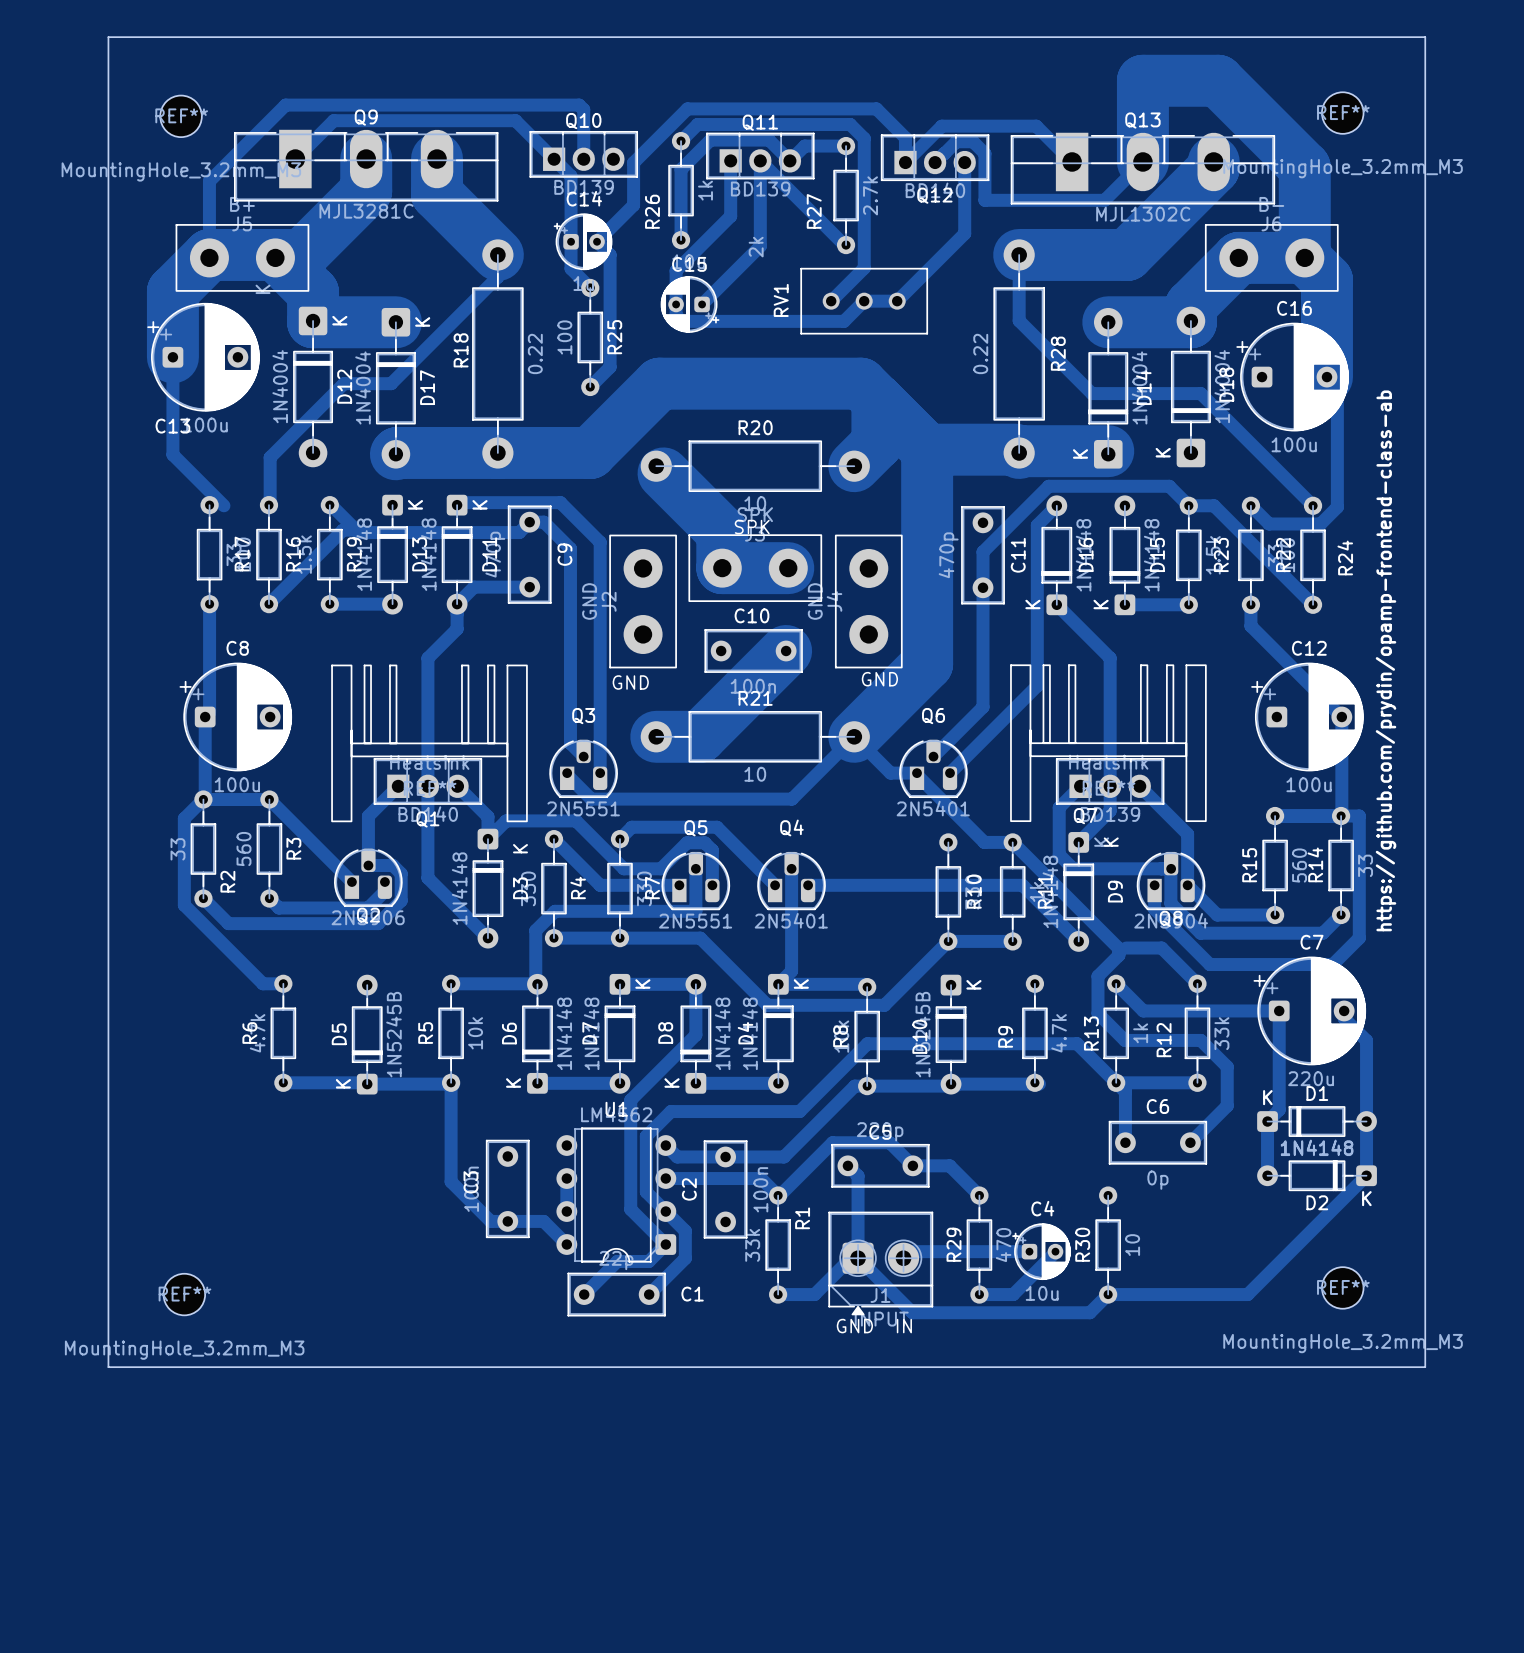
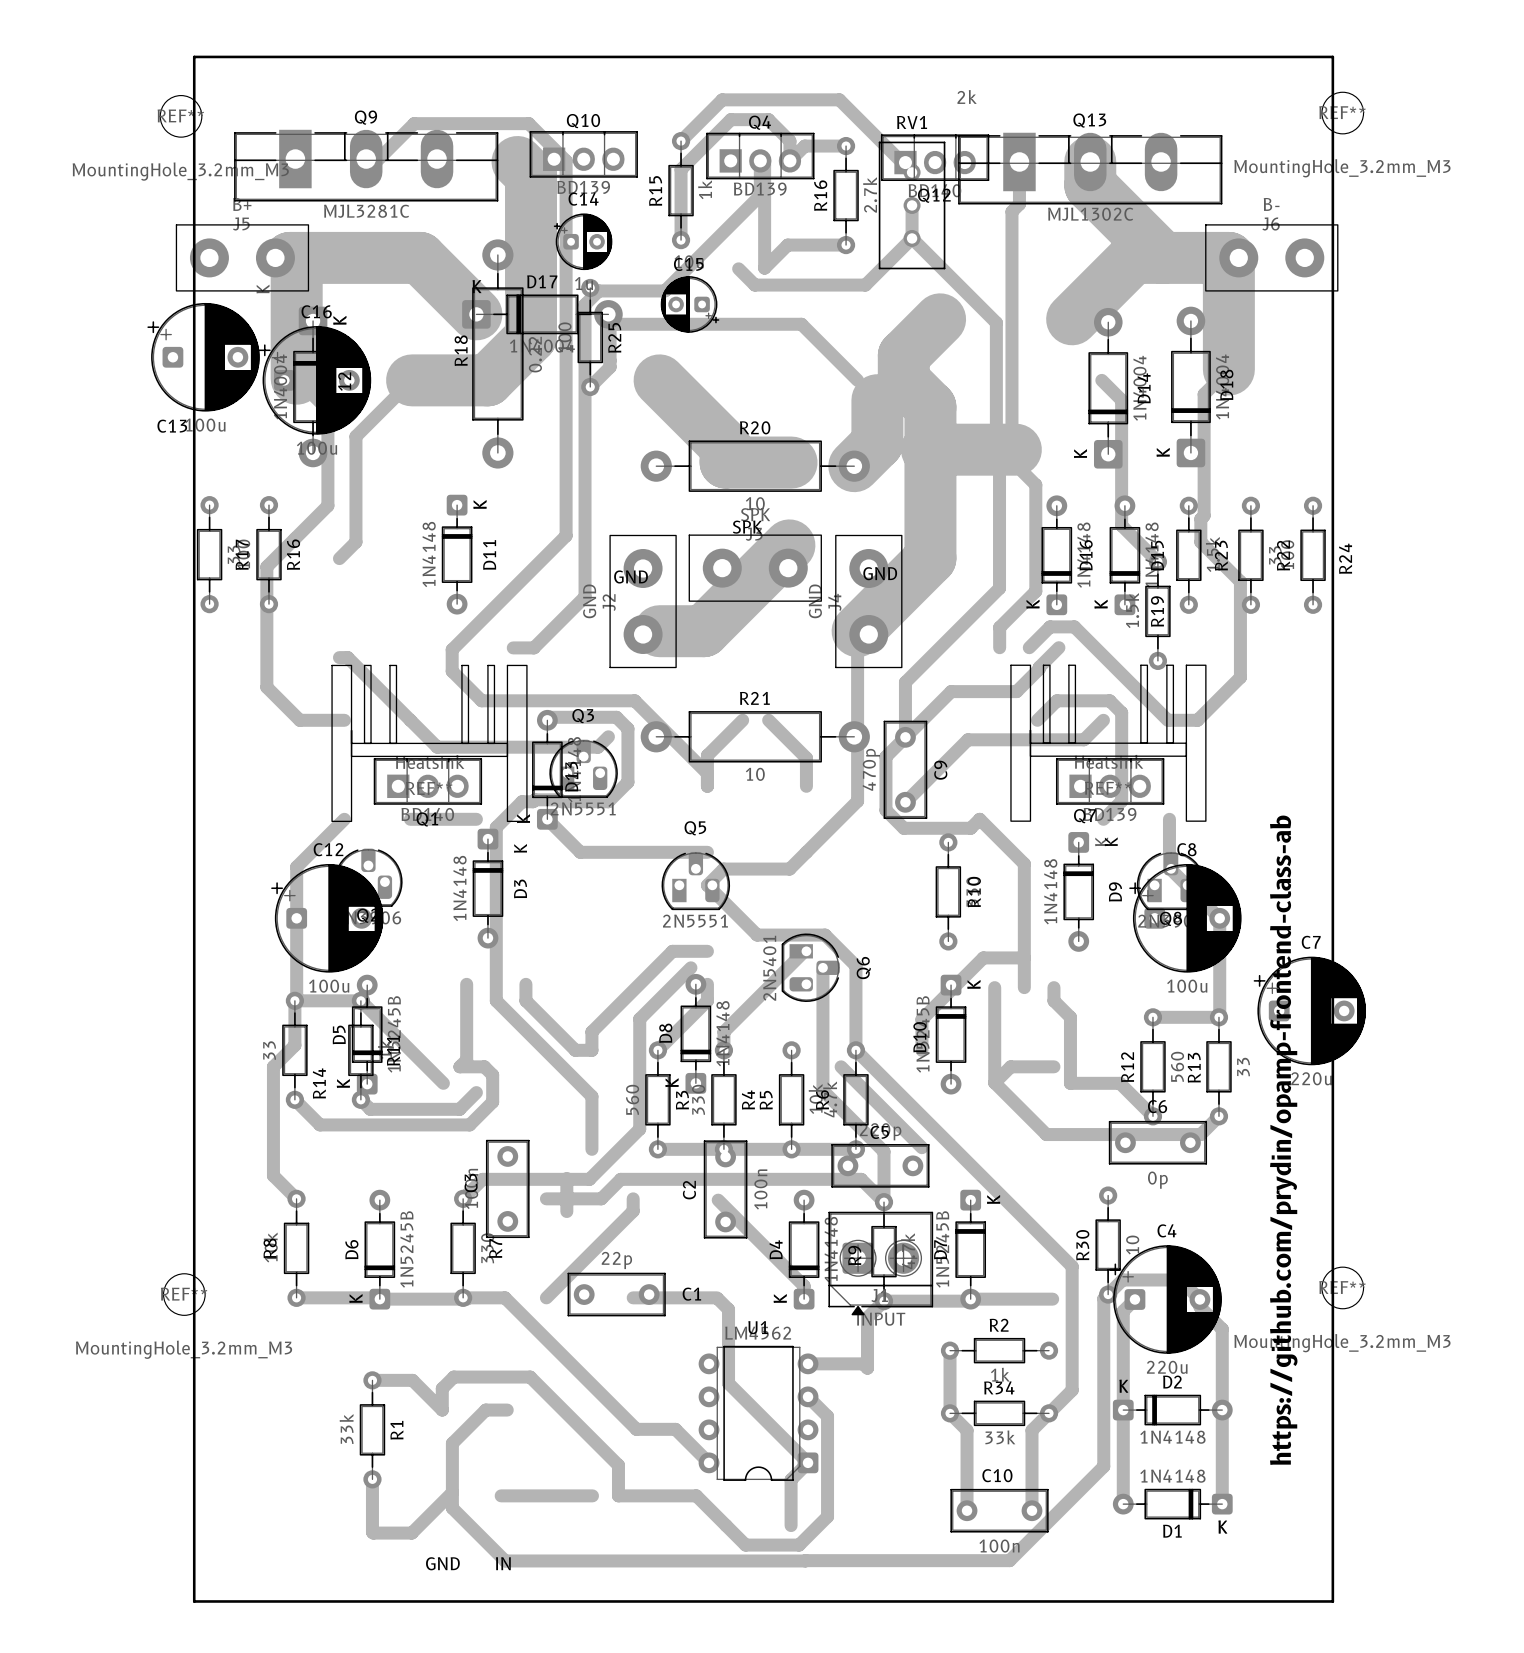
board edge: (108, 37) (1425, 37) (1425, 1367) (108, 1367) (108, 37) -> (194, 56) (194, 1601) (1332, 1601) (1332, 56) (194, 56)
Q11 name: Q11 (760, 122) -> Q4 (760, 122)
track: (697, 124) (850, 124) (864, 138) (864, 268) (831, 301) -> (697, 124) (722, 99) (839, 99) (912, 172)
track: (710, 140) (769, 140) (789, 160) -> (710, 140) (730, 119) (768, 119) (789, 141) (789, 160)
track: (295, 159) (333, 120) (515, 120) (571, 176) (571, 268) (590, 287) -> none
track: (366, 159) (366, 190) (302, 254) (209, 254) -> none
track: (437, 159) (437, 194) (497, 254) (497, 277) (391, 383) (344, 383) (270, 457) (270, 503) -> none
track: (583, 159) (583, 109) (579, 105) (285, 105) (209, 181) (209, 254) -> none
track: (730, 160) (730, 216) (676, 270) (676, 315) (681, 321) (844, 321) (864, 301) (897, 301) (964, 233) (964, 162) -> none
track: none -> (375, 161) (414, 123) (528, 123) (566, 160) (566, 535) (452, 649) (452, 671) (481, 700) (634, 700) (707, 773)
track: none -> (517, 161) (531, 175) (531, 336) (487, 380) (412, 380) (355, 436) (355, 542) (339, 558)
track: none -> (1019, 161) (1019, 204) (1011, 211) (1011, 461) (1035, 484) (1035, 591) (999, 627) (999, 647)
track: (1072, 161) (1036, 126) (941, 126) (905, 162) (905, 137) (876, 108) (687, 108) (633, 162) (633, 205) (597, 241) (610, 254) (610, 316) -> none
track: none -> (1090, 161) (1090, 185) (1162, 257)
track: (1213, 161) (1213, 168) (1127, 254) (1019, 254) (1019, 320) (1091, 393) (1200, 393) (1313, 505) -> none
track: (935, 162) (956, 141) (973, 141) (984, 153) (984, 200) (1104, 200) (1142, 161) (1142, 80) (1218, 80) (1304, 167) (1304, 257) -> none
track: (764, 165) (844, 245) -> (764, 165) (764, 268) (787, 245) (846, 245)
Q13 position: (1142, 168) -> (1090, 168)
track: (760, 195) (760, 246) (702, 304) -> (760, 195) (664, 290) (598, 290) (585, 304) (585, 596) (533, 647) (513, 647)
track: none -> (912, 205) (912, 238)
R26 name: R26 (652, 211) -> R15 (655, 191)
R27 name: R27 (814, 211) -> R16 (820, 195)
track: none -> (912, 238) (865, 285) (754, 285) (738, 268)
track: none -> (912, 238) (996, 322) (996, 467) (999, 470) (999, 588) (905, 682) (905, 737)
track: (209, 254) (172, 291) (172, 454) (223, 505) -> none
track: (275, 254) (313, 292) (313, 322) (395, 322) -> none
track: (1304, 257) (1238, 257) (1190, 305) (1190, 322) (1108, 322) -> none
track: (1304, 257) (1326, 280) (1326, 377) (1337, 387) (1337, 507) (1320, 523) (1269, 523) (1250, 505) -> none
RV1 rotation: 0° (864, 301) -> 90° clockwise (912, 205)
RV1 position: (864, 301) -> (912, 205)
track: none -> (476, 314) (419, 257) (289, 257) (296, 264) (296, 378) (327, 409) (327, 505) (266, 566) (266, 687) (299, 720) (344, 720)
track: none -> (940, 319) (903, 355) (903, 380) (930, 407) (930, 558) (857, 631) (857, 801) (789, 869) (723, 869) (707, 885) (757, 935) (825, 935) (855, 965) (855, 1050) (1072, 1266) (1072, 1390) (1032, 1430) (1032, 1510)
track: none -> (1072, 319) (1133, 257) (1228, 257) (1228, 369)
R28: 0.22 (1019, 353) -> none
track: none -> (610, 360) (608, 358) (608, 314) (618, 324) (801, 324) (857, 380)
C16 position: (1292, 377) -> (314, 380)
track: none -> (1219, 378) (1204, 394) (1204, 515) (1200, 518) (1200, 542) (1240, 581) (1240, 677) (1197, 720) (1169, 720)
track: none -> (659, 380) (725, 446) (725, 462) (791, 462)
track: none -> (1101, 380) (1121, 400) (1121, 525) (1157, 561)
D17 rotation: 0° (395, 388) -> 90° counterclockwise (542, 314)
D17 position: (395, 388) -> (542, 314)
track: (1108, 451) (1020, 451) (1019, 452) -> none
track: (395, 454) (590, 452) (659, 383) (860, 383) (927, 449) (927, 663) (854, 736) -> none
track: (663, 473) (722, 532) (722, 568) (788, 568) -> none
track: (459, 502) (560, 502) (600, 542) (600, 773) -> none
track: (331, 505) (358, 532) (519, 532) (529, 522) (543, 522) (570, 548) (570, 743) (583, 756) -> none
track: (1056, 505) (1037, 525) (1037, 685) (950, 773) -> none
track: (356, 530) (342, 530) (268, 604) -> none
R19 position: (329, 554) -> (1157, 611)
R19 name position: R19 (354, 554) -> R19 (1157, 611)
D13 rotation: 0° (392, 554) -> 180° (547, 769)
D13 position: (392, 554) -> (547, 769)
C9 position: (529, 554) -> (905, 769)
C11: 470p (983, 555) -> none
track: (529, 587) (474, 587) (457, 604) (457, 629) (427, 658) (427, 878) (487, 938) -> none
track: (209, 604) (209, 712) (205, 717) (205, 797) -> none
track: (329, 604) (392, 604) -> none
track: (1056, 604) (1110, 658) (1110, 810) (1078, 842) -> none
track: (1124, 604) (1188, 604) -> none
track: (1250, 604) (1250, 626) (1341, 717) (1341, 815) -> none
track: (1313, 604) (1214, 505) (1188, 505) (1169, 486) (1048, 486) (983, 552) (983, 707) (933, 756) -> none
track: none -> (1029, 647) (1050, 626) (1074, 626) (1167, 720)
track: none -> (1058, 647) (1016, 691) (951, 691) (885, 756) (885, 810) (903, 828) (970, 828) (979, 819) (1024, 863) (1024, 987)
C10 position: (753, 651) -> (999, 1510)
track: (786, 651) (700, 736) (656, 736) -> (789, 545) (703, 631) (659, 631)
track: none -> (339, 657) (347, 657) (437, 747) (598, 747) (608, 736)
text: https://github.com/prydin/opamp-frontend-class-ab (1386, 660) -> none
text position: GND (879, 679) -> GND (880, 573)
text position: GND (630, 682) -> GND (631, 576)
C8 position: (235, 717) -> (1185, 918)
C12 position: (1307, 717) -> (327, 918)
track: none -> (547, 720) (550, 717) (616, 717) (627, 728) (627, 782) (608, 801) (561, 801) (559, 799) (522, 801) (496, 827) (496, 1000) (591, 1096) (591, 1149)
track: none -> (742, 720) (707, 755) (707, 786)
track: none -> (768, 720) (806, 758) (806, 786)
track: none -> (1037, 720) (1056, 700) (1109, 700) (1121, 712) (1121, 801) (1103, 819)
track: none -> (1103, 720) (1083, 739) (967, 739) (905, 802)
track: (854, 736) (792, 799) (591, 799) (567, 775) -> none
track: (854, 736) (890, 773) (917, 773) -> none
Q6 rotation: 0° (933, 768) -> 90° clockwise (810, 967)
Q6 position: (933, 768) -> (810, 967)
track: (917, 775) (984, 842) (1012, 842) (1118, 948) (1118, 955) (1097, 976) (1097, 1013) (1124, 1040) (1200, 1040) (1227, 1066) (1227, 1105) (1190, 1142) -> none
track: (398, 786) (368, 816) (368, 865) (392, 865) (401, 873) (401, 900) (378, 923) (228, 923) (203, 898) -> none
track: (457, 786) (487, 816) (487, 839) (506, 820) (576, 820) (623, 868) (660, 868) (686, 842) (704, 842) (712, 850) (712, 885) -> none
track: (1080, 786) (1059, 807) (1059, 854) (1073, 868) (1171, 868) -> none
track: (1139, 786) (1187, 834) (1187, 885) (1217, 915) (1275, 915) -> none
track: (1275, 816) (1359, 816) (1359, 938) (1332, 964) (1209, 964) (1154, 909) (1154, 885) -> none
track: none -> (344, 819) (296, 867) (296, 999)
track: none -> (410, 819) (476, 819)
track: none -> (547, 819) (580, 852) (707, 852)
track: none -> (1169, 819) (1169, 868) (1219, 918) (1219, 1016)
track: (553, 839) (600, 885) (679, 885) -> none
track: (619, 839) (631, 827) (717, 827) (775, 885) -> none
R2 value: 33 (177, 849) -> 1k (1000, 1374)
R2 rotation: 0° (203, 849) -> 90° clockwise (999, 1350)
R2 position: (203, 849) -> (999, 1350)
R3 position: (269, 849) -> (657, 1099)
R14 name position: R14 (1315, 864) -> R14 (319, 1083)
R15: 560 (1275, 865) -> none
R14 position: (1341, 865) -> (294, 1050)
R14 value position: 33 (1365, 865) -> 33 (269, 1050)
track: (695, 868) (695, 911) (555, 911) (535, 930) (535, 982) (537, 984) -> none
track: (791, 868) (791, 971) (778, 984) (864, 984) (867, 987) -> none
track: (1169, 868) (1170, 903) (1200, 933) (1322, 933) (1341, 915) -> none
R2 name position: R2 (227, 881) -> R2 (999, 1325)
Q4: 2N5401 (791, 881) -> none
track: (351, 882) (269, 799) (203, 799) (184, 818) (184, 905) (262, 983) (283, 983) -> none
track: (808, 885) (1022, 885) (1078, 941) -> none
R4 position: (553, 888) -> (723, 1099)
R7 position: (619, 888) -> (463, 1248)
track: (384, 891) (368, 908) (278, 908) (269, 898) -> (476, 1092) (459, 1109) (370, 1109) (360, 1099)
R11 position: (1012, 891) -> (360, 1050)
track: (553, 938) (700, 938) (767, 1005) (884, 1005) (948, 941) (1012, 941) -> none
track: (1126, 948) (1161, 948) (1197, 983) -> none
track: none -> (707, 951) (672, 951) (591, 1031) (591, 1050) (575, 1050) (525, 1000) (525, 984)
track: none -> (804, 951) (723, 1031) (723, 1050)
track: none -> (1024, 957) (983, 957) (921, 1019) (921, 1050)
track: none -> (690, 967) (639, 1019) (639, 1129) (589, 1179) (482, 1179) (463, 1198)
track: none -> (822, 967) (822, 1090) (884, 1151) (884, 1202) (861, 1179) (620, 1179) (601, 1198) (546, 1198)
track: (451, 983) (536, 983) -> none
track: (1116, 983) (1143, 1010) (1279, 1010) (1279, 1109) (1267, 1121) (1267, 1175) -> none
track: none -> (466, 984) (466, 1060) (459, 1066) (484, 1066) (492, 1075) (492, 1102) (469, 1124) (320, 1124) (294, 1099)
track: (619, 984) (695, 984) (695, 1035) (630, 1100) (630, 1209) (665, 1244) (648, 1261) (617, 1261) (584, 1294) -> none
track: none -> (707, 984) (707, 1000) (657, 1050)
track: none -> (994, 987) (994, 1082)
track: none -> (1053, 987) (1053, 1000) (1070, 1017) (1070, 1083) (1119, 1083) (1152, 1116)
track: (1344, 1010) (1344, 1018) (1366, 1040) (1366, 1175) (1247, 1294) (1108, 1294) (1089, 1312) (912, 1312) (858, 1258) (858, 1175) (847, 1165) -> none
track: none -> (1152, 1017) (1218, 1017)
R6 position: (283, 1033) -> (855, 1099)
R5 position: (451, 1033) -> (791, 1099)
D6 position: (537, 1033) -> (379, 1249)
D6 value: 1N4148 (564, 1033) -> 1N5245B (406, 1249)
D7 value: 1N4148 (591, 1033) -> 1N5245B (942, 1249)
D7 position: (619, 1033) -> (970, 1249)
D4 rotation: 0° (778, 1033) -> 180° (804, 1249)
D4 position: (778, 1033) -> (804, 1249)
R9 position: (1034, 1033) -> (884, 1251)
R13 position: (1116, 1033) -> (1218, 1066)
R13 value: 1k (1140, 1033) -> 33 (1243, 1067)
R12 position: (1197, 1033) -> (1152, 1066)
R12 value: 33k (1221, 1033) -> 560 (1177, 1066)
R8 position: (867, 1036) -> (296, 1248)
R12 name position: R12 (1164, 1040) -> R12 (1127, 1067)
text: none -> https://github.com/prydin/opamp-frontend-class-ab (1283, 1140)
track: none -> (841, 1066) (921, 1147)
track: none -> (1053, 1066) (1010, 1066) (994, 1082)
track: (283, 1082) (365, 1082) -> (296, 1297) (378, 1297)
track: (451, 1082) (451, 1181) (490, 1221) (543, 1221) (566, 1244) -> none
track: none -> (994, 1082) (1046, 1134) (1200, 1134) (1218, 1116)
track: (1116, 1082) (1197, 1082) -> none
track: none -> (443, 1083) (360, 1000) (294, 1000) (294, 1045) (273, 1066) (273, 1175) (296, 1198)
track: (537, 1083) (619, 1083) -> none
track: (695, 1083) (778, 1083) -> none
track: (366, 1084) (453, 1084) -> (379, 1299) (466, 1299)
track: (957, 1084) (1039, 1084) -> (970, 1299) (1052, 1299)
track: (867, 1086) (854, 1086) (783, 1156) (677, 1156) (665, 1145) -> none
track: (870, 1086) (955, 1086) -> none
D1 rotation: 0° (1317, 1121) -> 180° (1172, 1504)
D1 position: (1317, 1121) -> (1172, 1504)
track: (1125, 1142) (1125, 1092) (1077, 1043) (867, 1043) (799, 1111) (670, 1111) (646, 1136) (646, 1192) (685, 1231) (685, 1258) (649, 1294) -> none
track: none -> (657, 1149) (855, 1149)
D2 rotation: 0° (1317, 1175) -> 180° (1172, 1410)
D2 position: (1317, 1175) -> (1172, 1410)
track: (665, 1178) (761, 1178) (778, 1195) -> none
U1 position: (616, 1195) -> (758, 1413)
track: (779, 1195) (832, 1142) (889, 1142) (912, 1165) (949, 1165) (979, 1195) -> none
track: none -> (633, 1198) (633, 1211) (546, 1297)
track: none -> (718, 1200) (804, 1286) (804, 1299)
C4 name position: C4 (1042, 1208) -> C4 (1166, 1230)
R1 name position: R1 (802, 1218) -> R1 (396, 1430)
C4 footprint: [1012, 1223, 1071, 1280] -> [1109, 1245, 1222, 1354]
R1 position: (778, 1245) -> (372, 1429)
R29: 470 (979, 1245) -> none
track: (1029, 1251) (910, 1251) (903, 1258) -> none
track: (1055, 1252) (1013, 1294) (979, 1294) -> none
track: (850, 1258) (814, 1294) (778, 1294) -> none
C4 value: 10u (1042, 1293) -> 220u (1167, 1367)
track: none -> (463, 1297) (504, 1297) (636, 1429) (675, 1429) (709, 1462)
track: none -> (633, 1297) (716, 1297)
track: none -> (718, 1299) (728, 1309) (728, 1383) (808, 1462) (791, 1479) (791, 1525)
track: none -> (1134, 1299) (1123, 1311) (1123, 1504)
track: none -> (968, 1301) (884, 1301) (867, 1317) (867, 1368) (863, 1363) (808, 1363)
text: GND (854, 1326) -> none
text: IN (904, 1326) -> none
track: none -> (950, 1350) (950, 1413) (967, 1430) (967, 1510)
track: none -> (372, 1380) (412, 1380) (442, 1410) (442, 1388) (453, 1377) (530, 1377) (618, 1465) (618, 1495) (696, 1495) (745, 1545) (799, 1545) (827, 1516) (827, 1416) (808, 1396)
track: none -> (507, 1410) (485, 1410) (452, 1443) (452, 1508) (505, 1560) (1009, 1560) (1103, 1466) (1103, 1298) (1122, 1280) (1180, 1280) (1199, 1299) (1199, 1306) (1222, 1329) (1222, 1504)
R34: none -> 33k (999, 1413)
track: none -> (372, 1479) (373, 1533) (411, 1533) (452, 1492)
track: none -> (501, 1495) (592, 1495)
text: none -> GND (442, 1563)
text: none -> IN (503, 1563)

